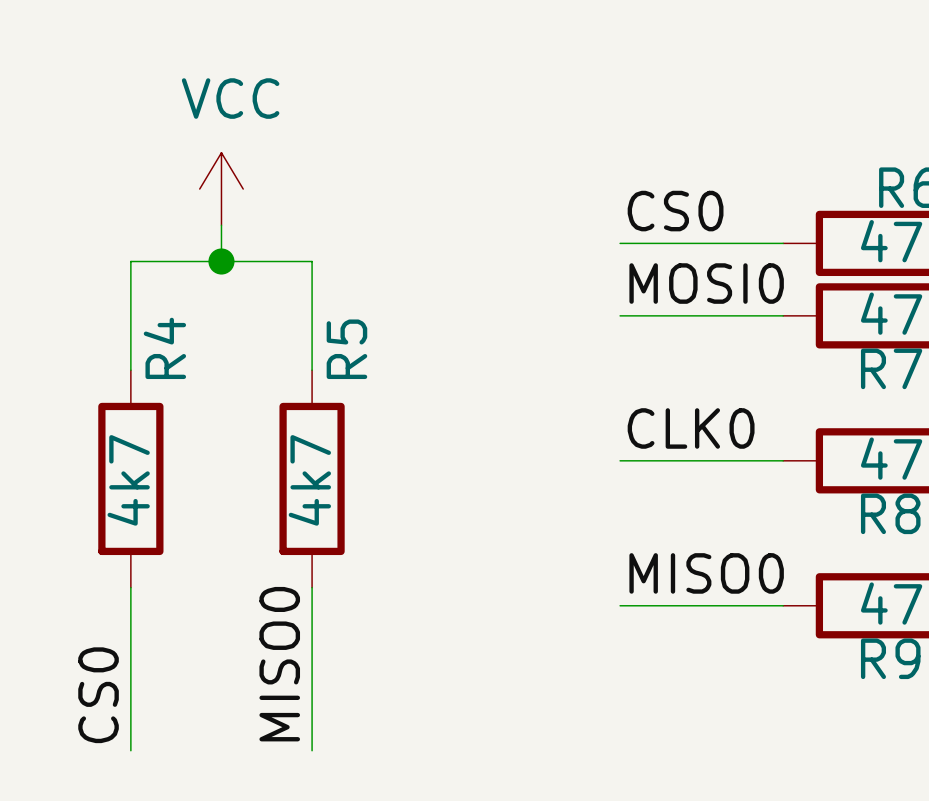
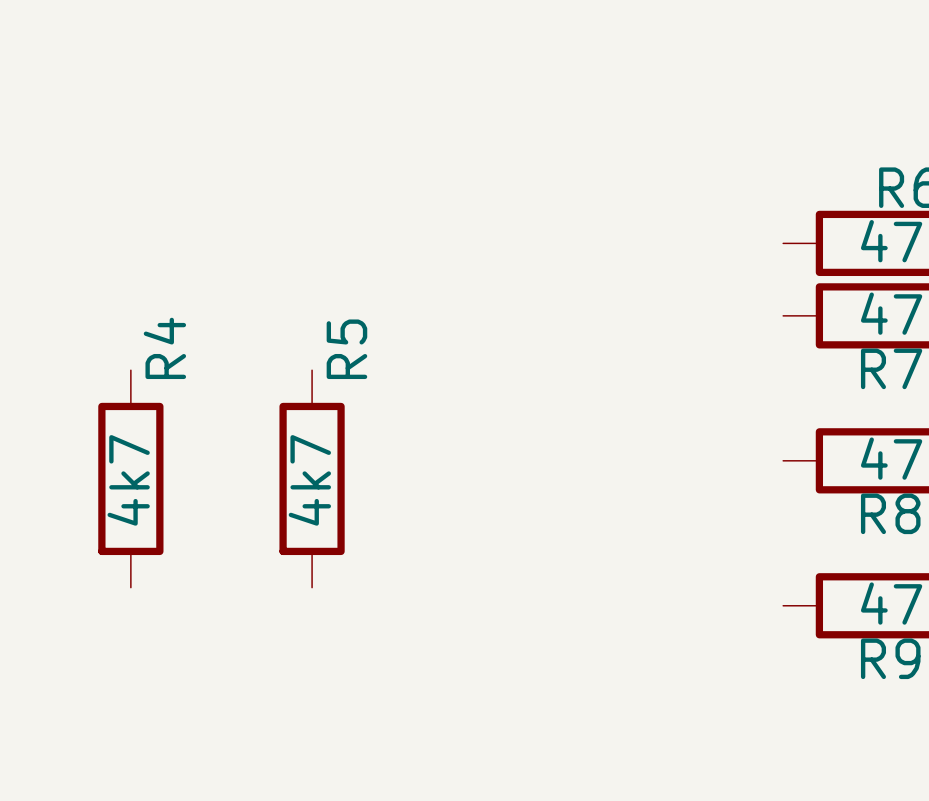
power symbol: VCC (221, 189) -> none
label: CS0 (675, 211) -> none
wire: (221, 225) (221, 261) -> none
wire: (620, 243) (783, 243) -> none
junction: (221, 261) -> none
label: MOSI0 (706, 283) -> none
wire: (620, 315) (783, 315) -> none
wire: (130, 370) (130, 261) (312, 261) (312, 370) -> none
label: CLK0 (691, 428) -> none
wire: (620, 460) (783, 460) -> none
label: MISO0 (706, 573) -> none
wire: (130, 587) (130, 750) -> none
wire: (312, 587) (312, 750) -> none
wire: (620, 605) (783, 605) -> none
label: MISO0 (279, 664) -> none
label: CS0 (98, 695) -> none

